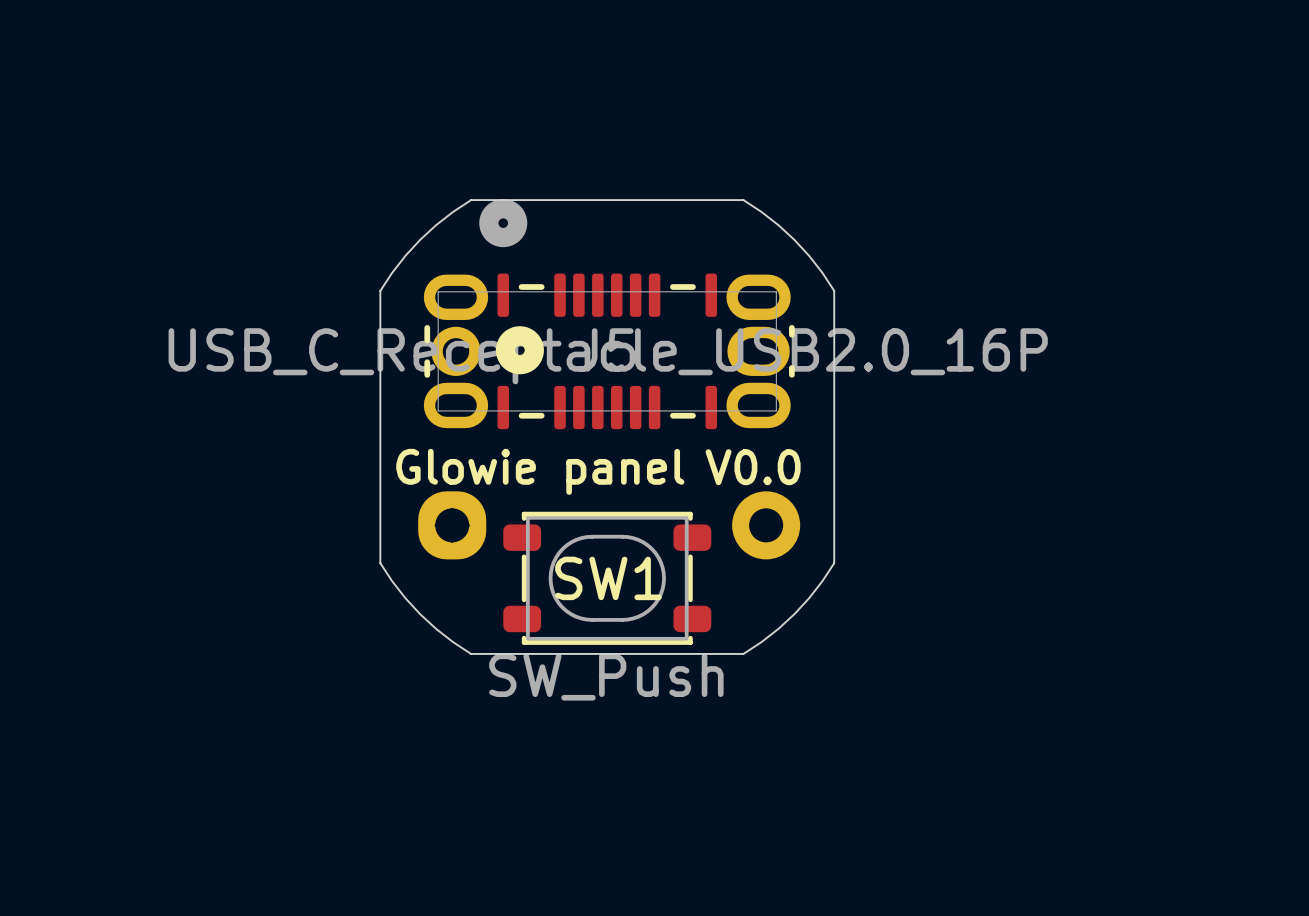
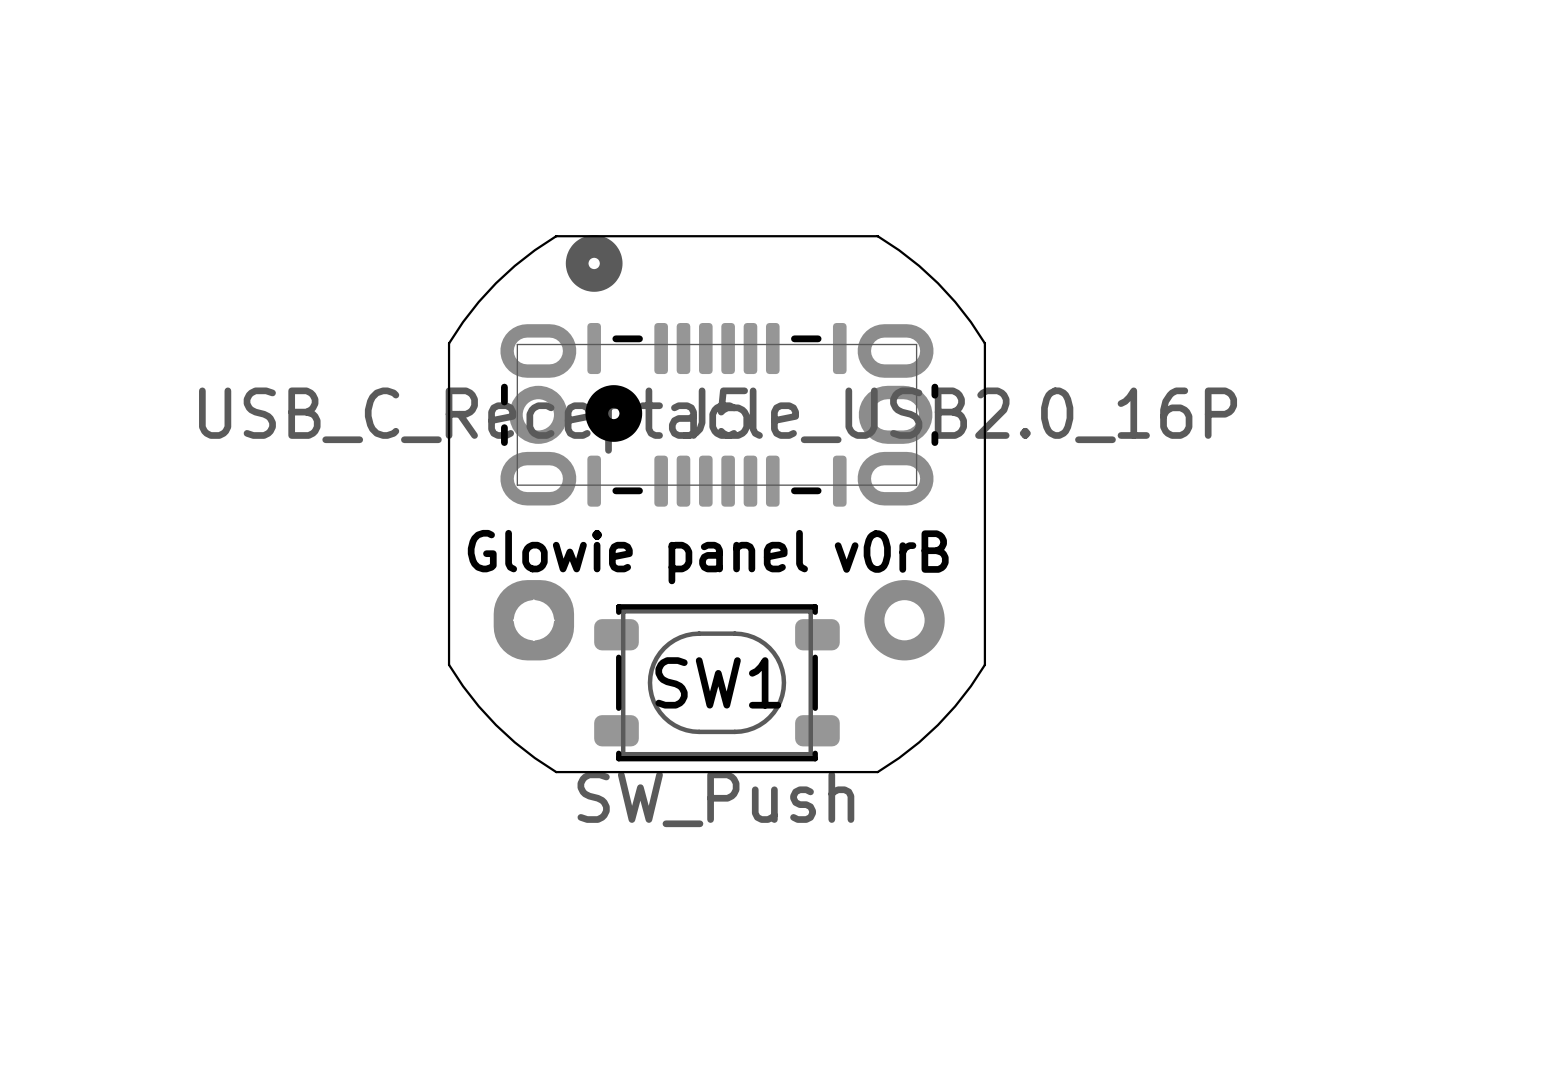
text: V0.0 (753, 467) -> v0rB (891, 551)

